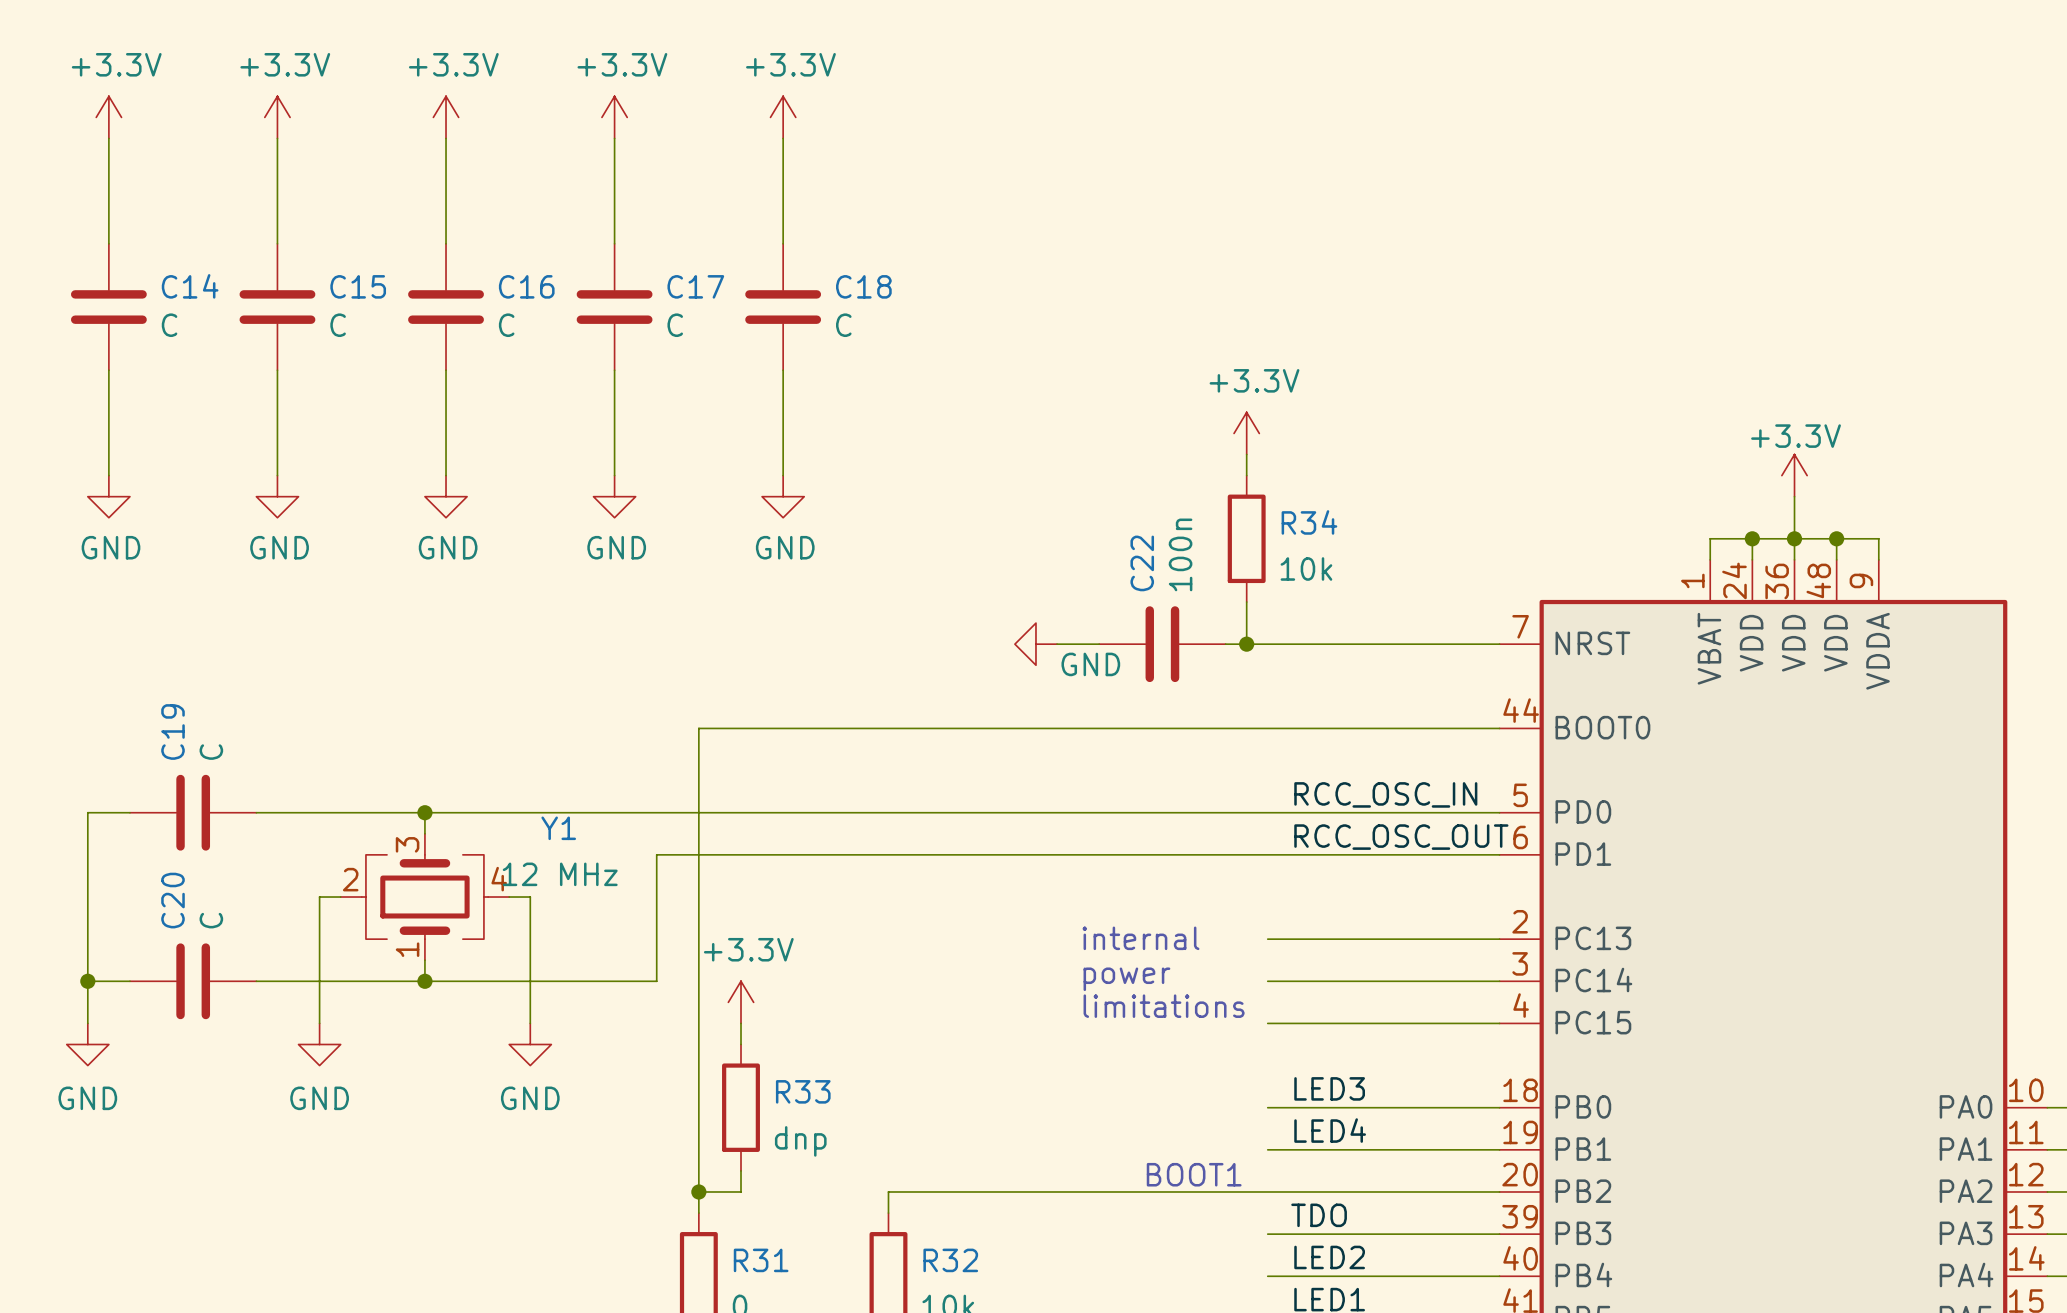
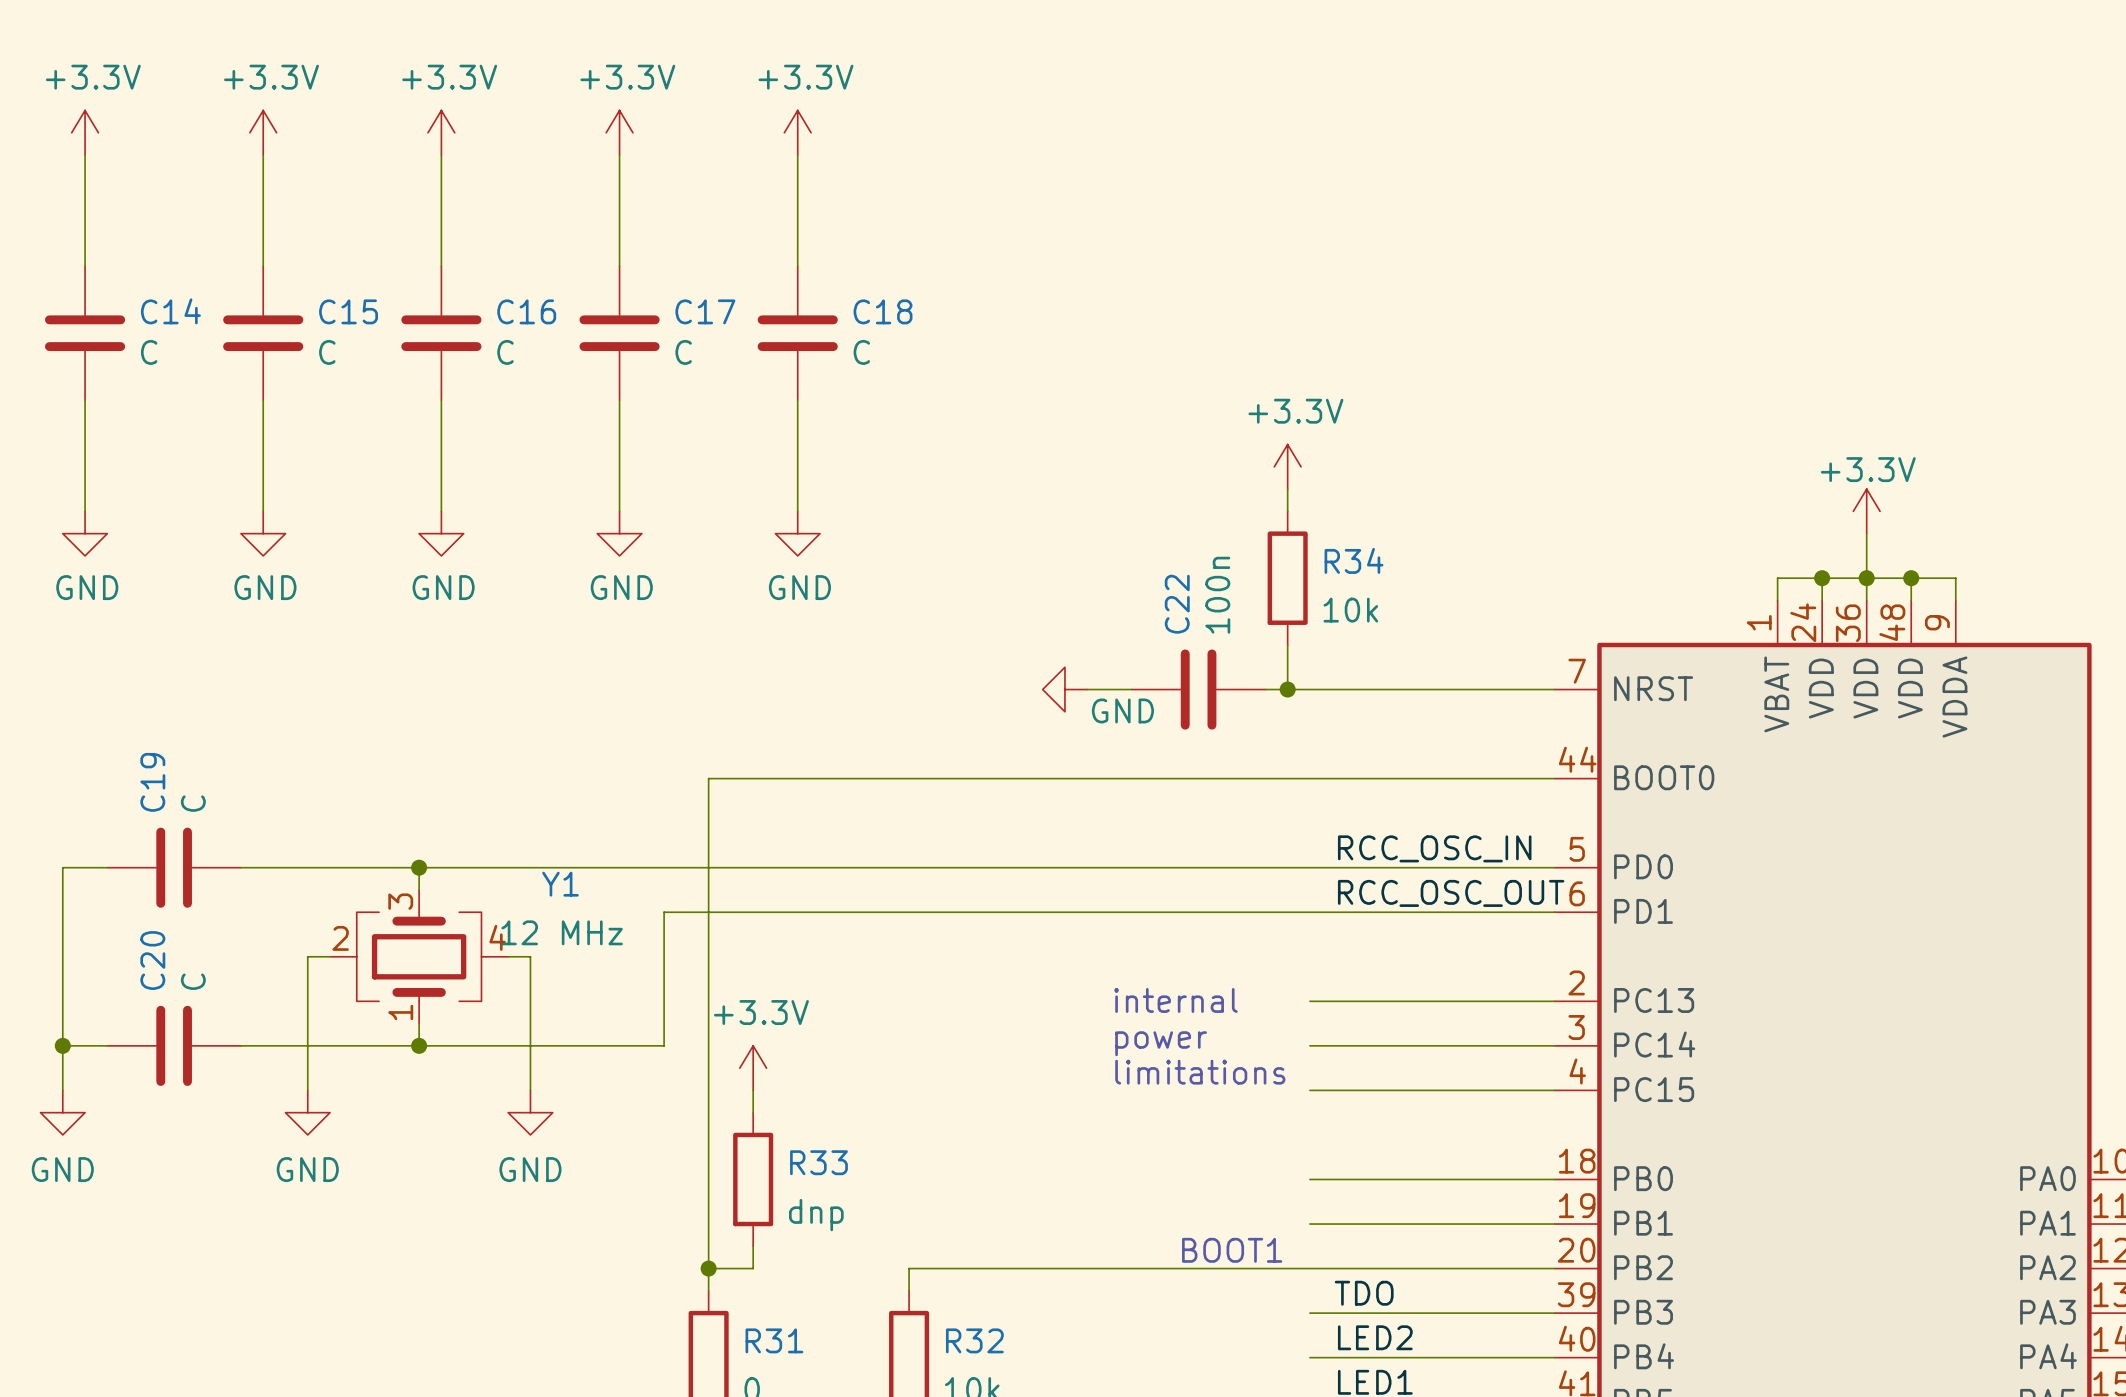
label: LED3 (1329, 1088) -> none
label: LED4 (1330, 1130) -> none

